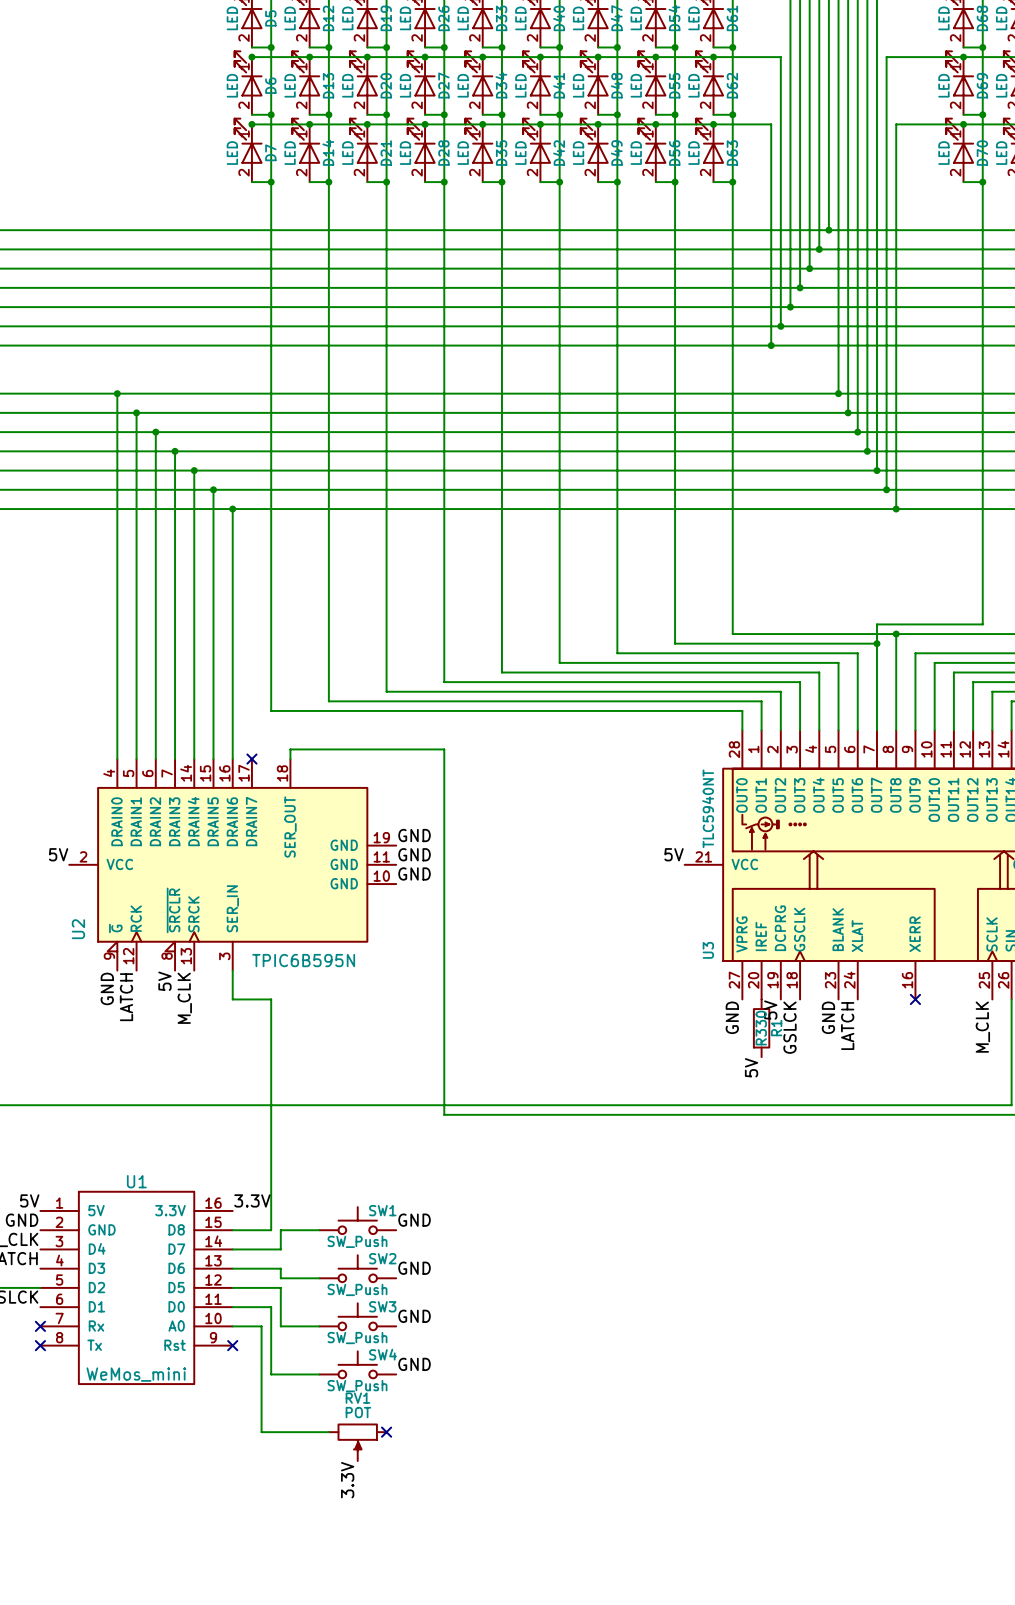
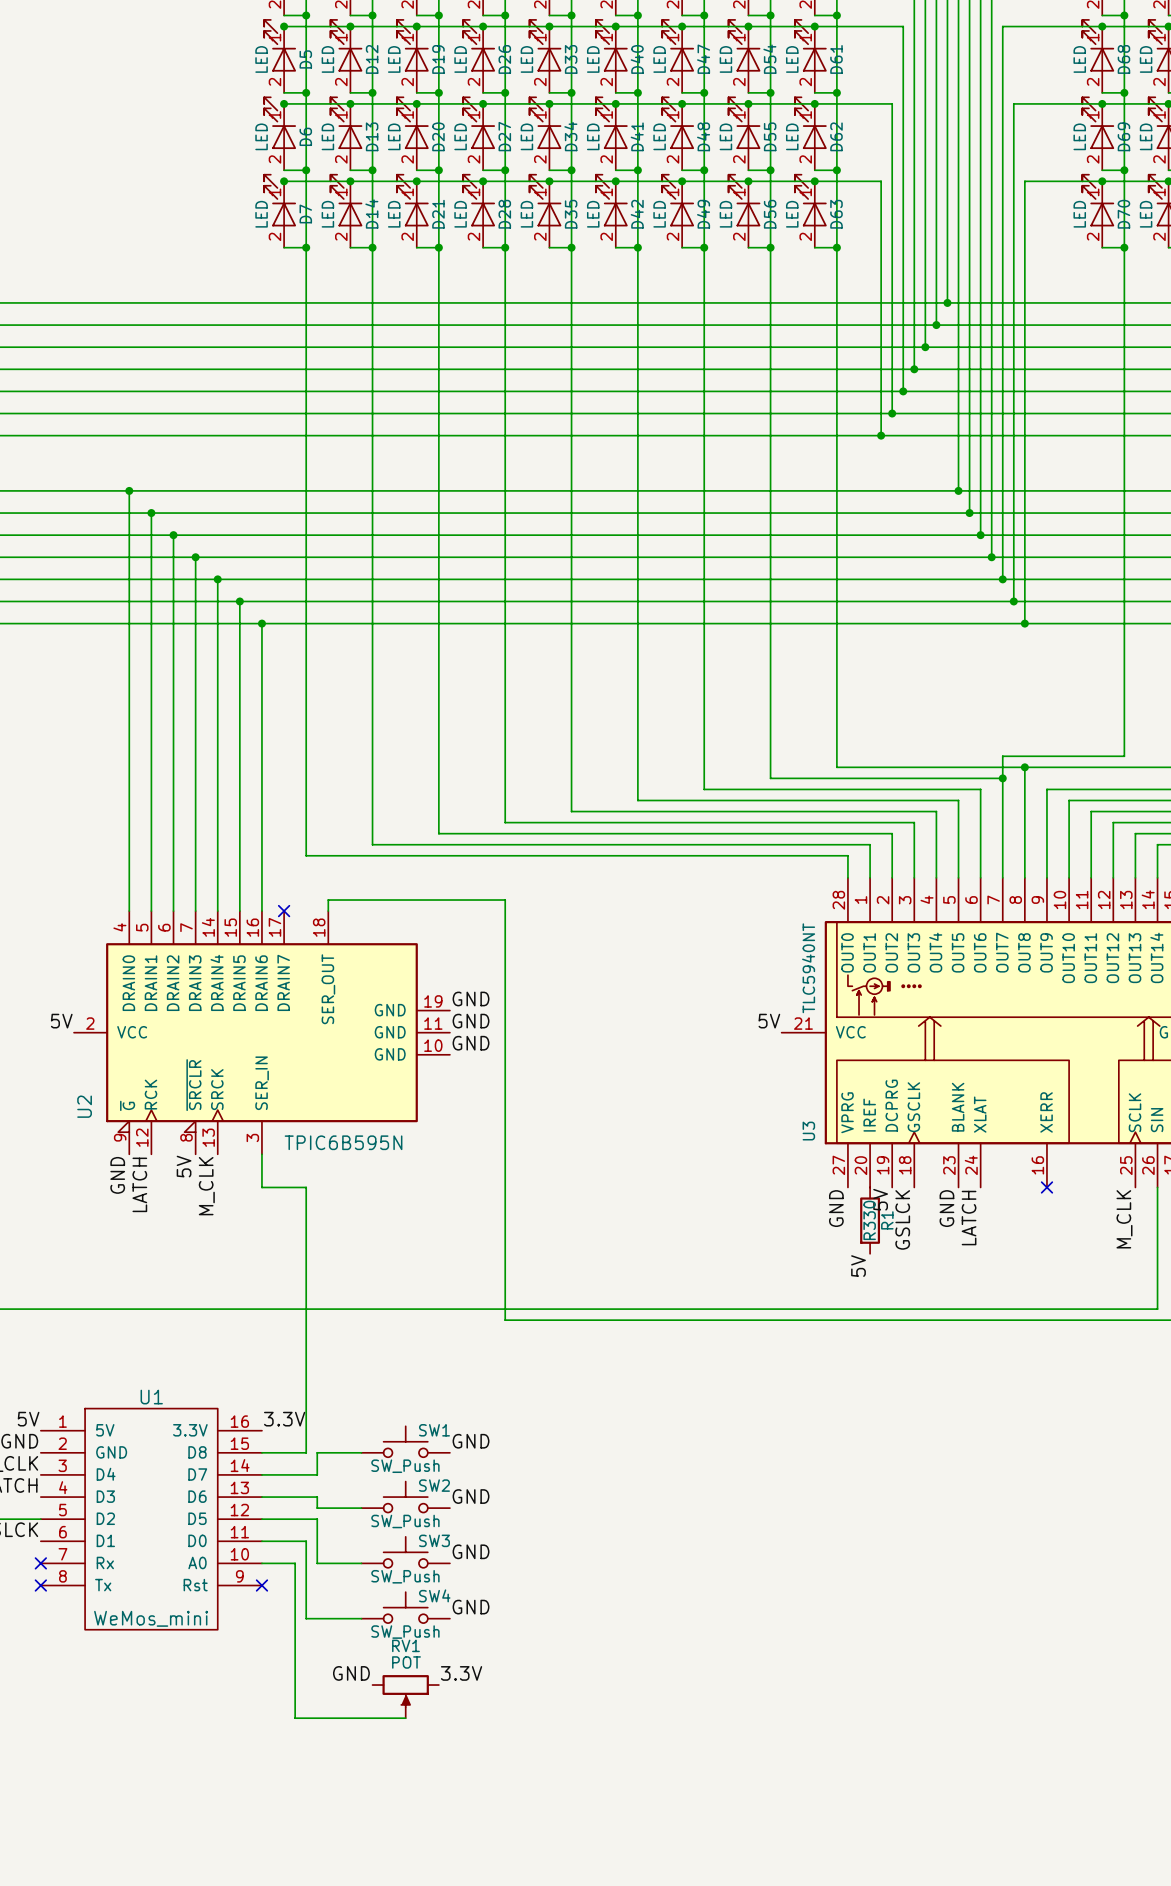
label: none -> GND (351, 1673)
wire: (261, 1432) (328, 1432) -> (295, 1685) (295, 1718) (405, 1718)
no-connect mark: (386, 1432) -> none
label rotation: 0° (347, 1480) -> 90° clockwise (461, 1673)
label position: 3.3V (347, 1480) -> 3.3V (461, 1673)

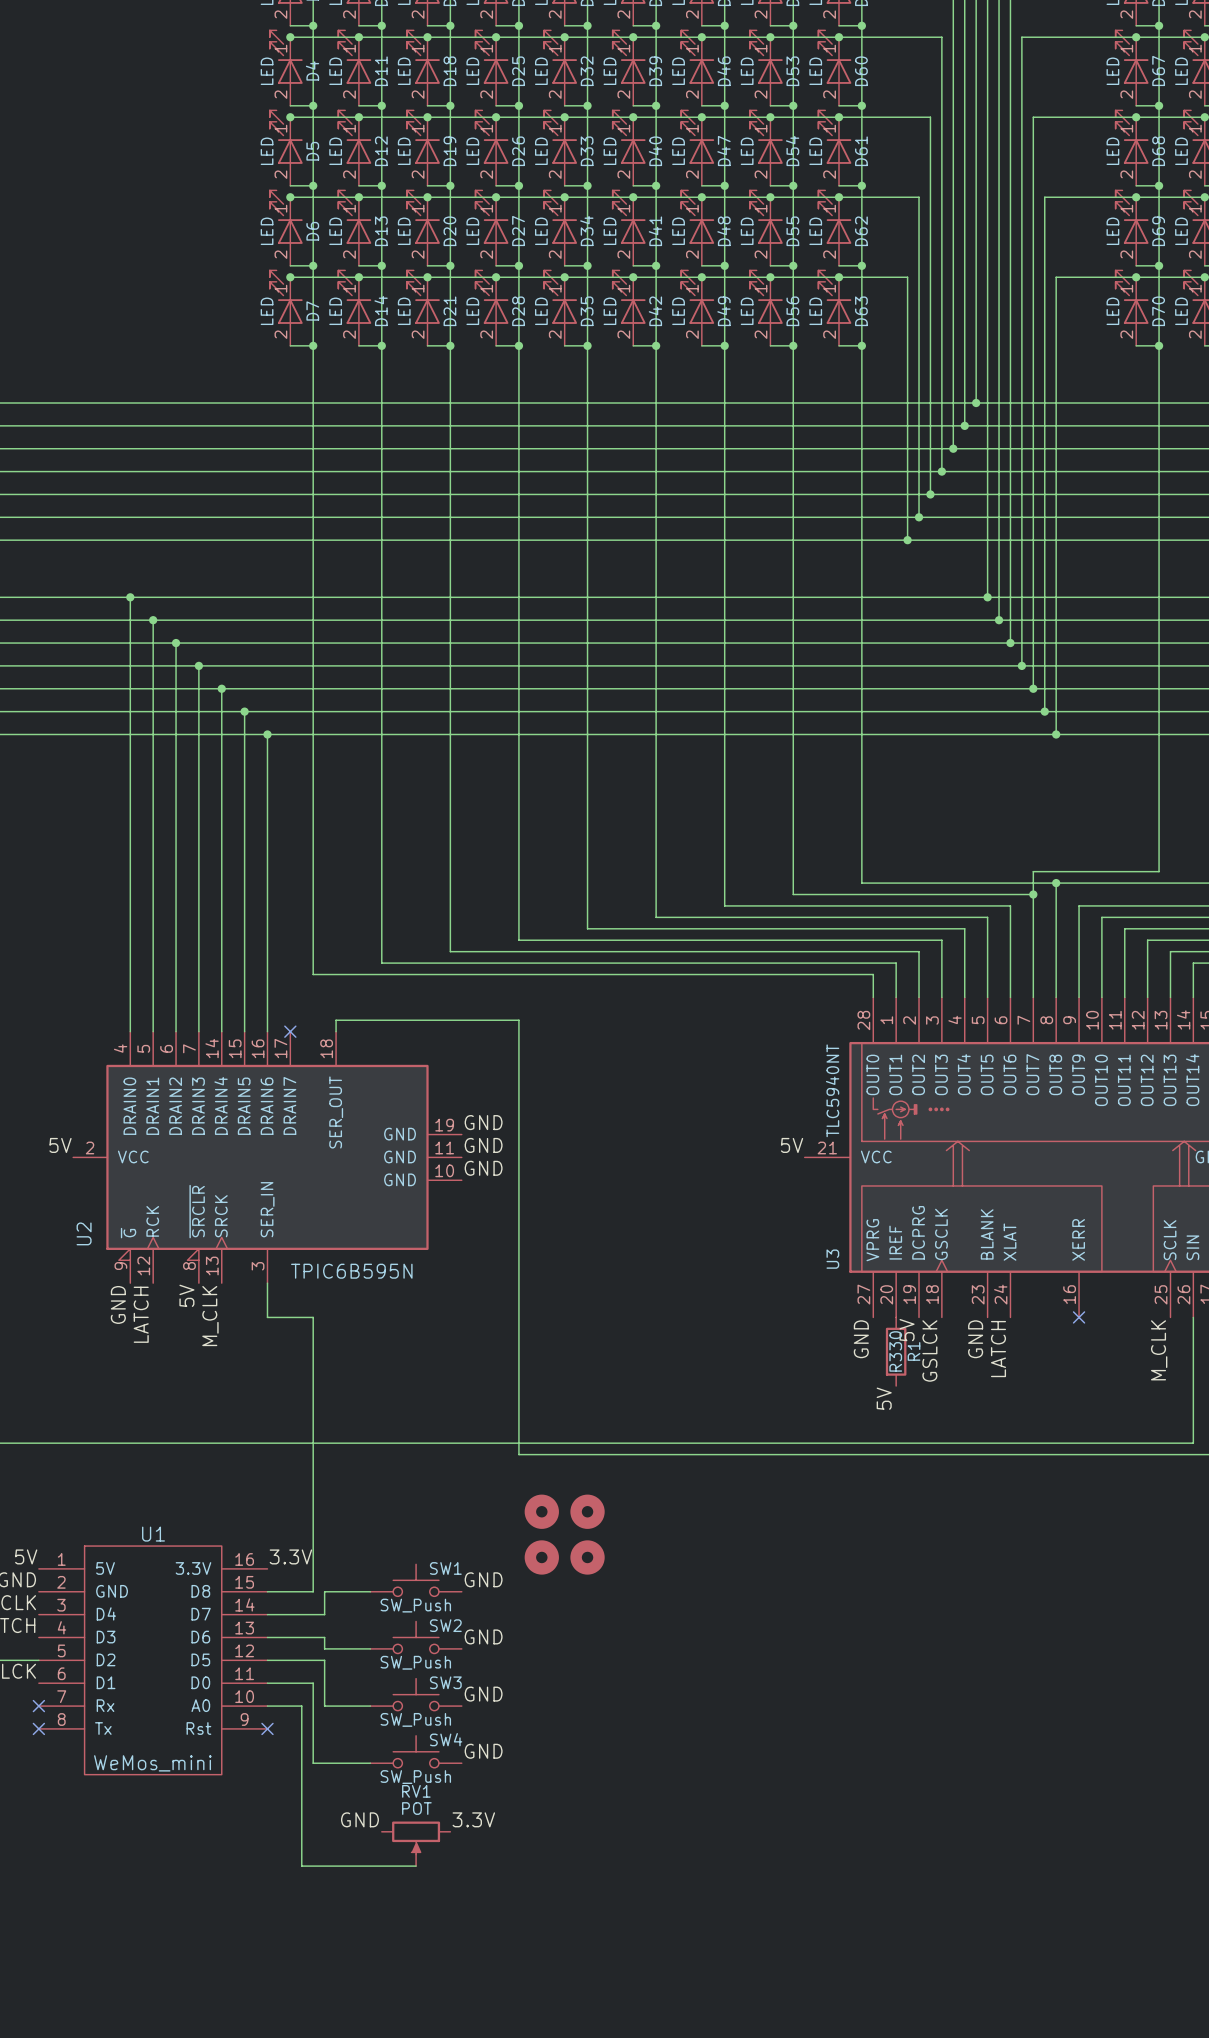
part: none -> (541, 1511)
part: none -> (587, 1511)
part: none -> (541, 1557)
part: none -> (587, 1557)

